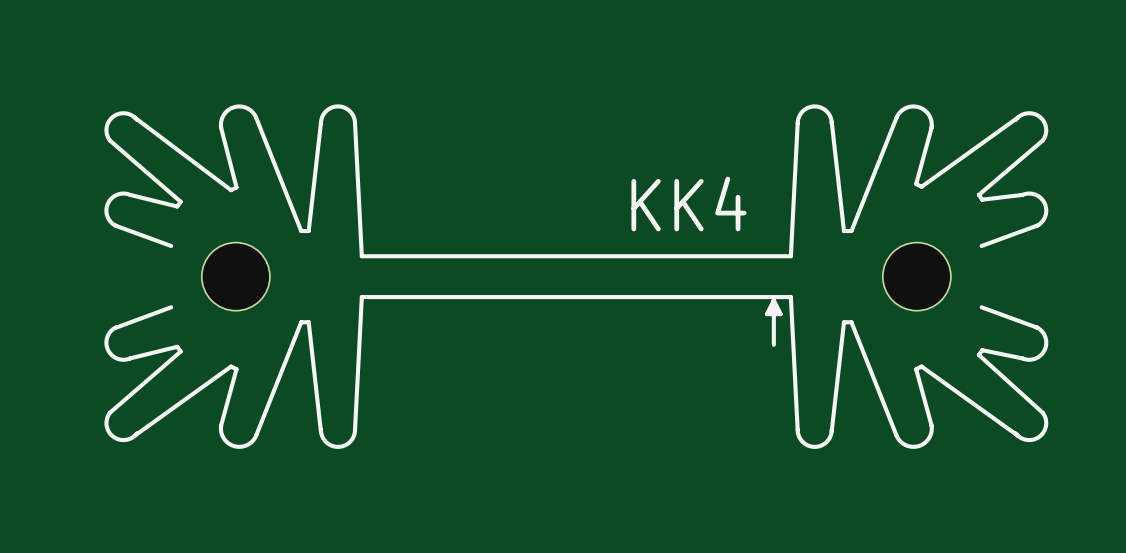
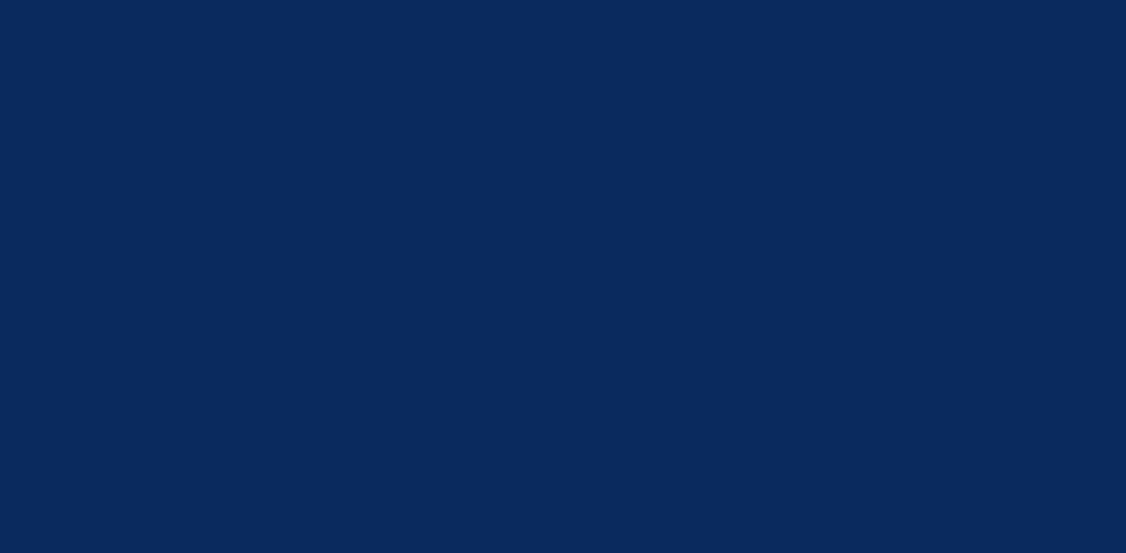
KK4: (576, 276) -> none

